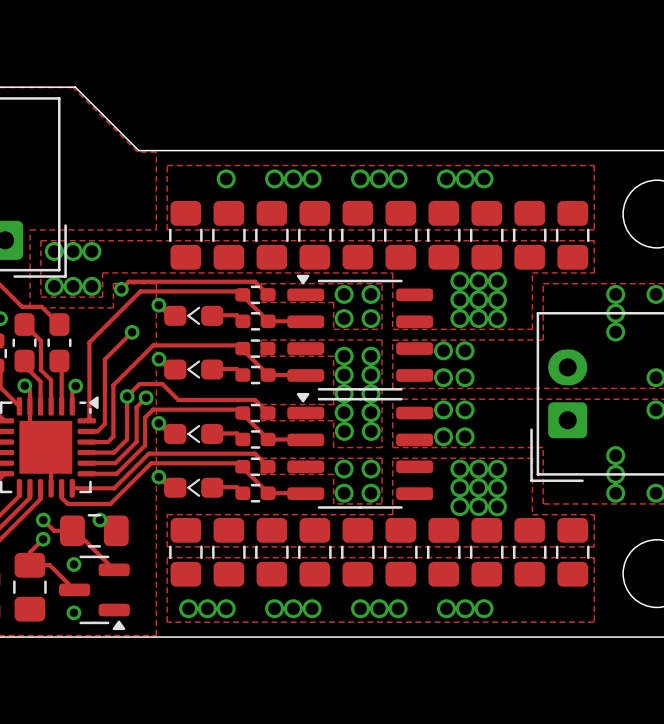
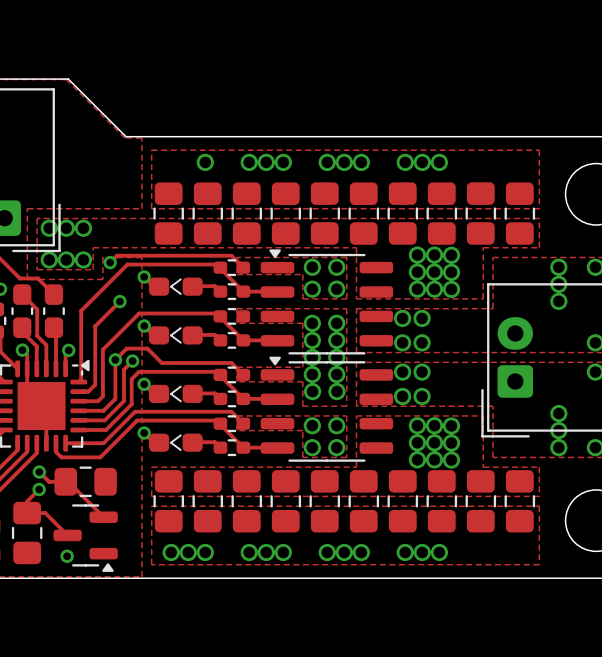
via: (99, 520) -> none
via: (73, 564) -> none

